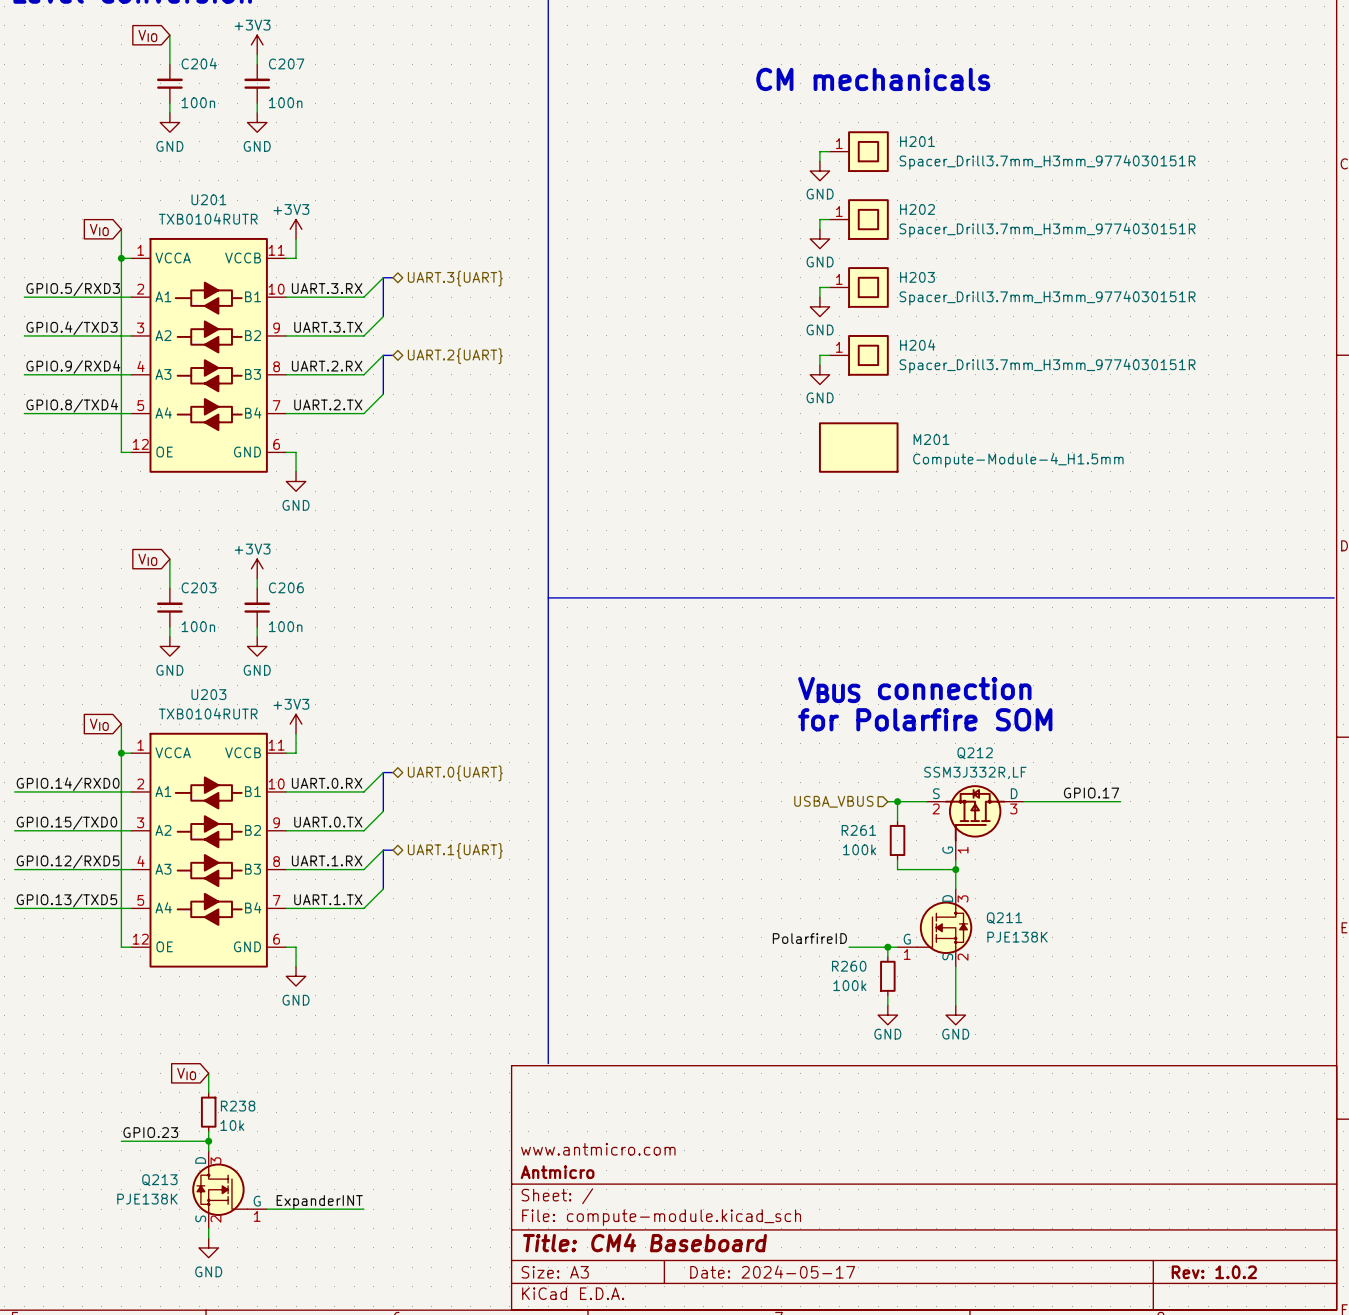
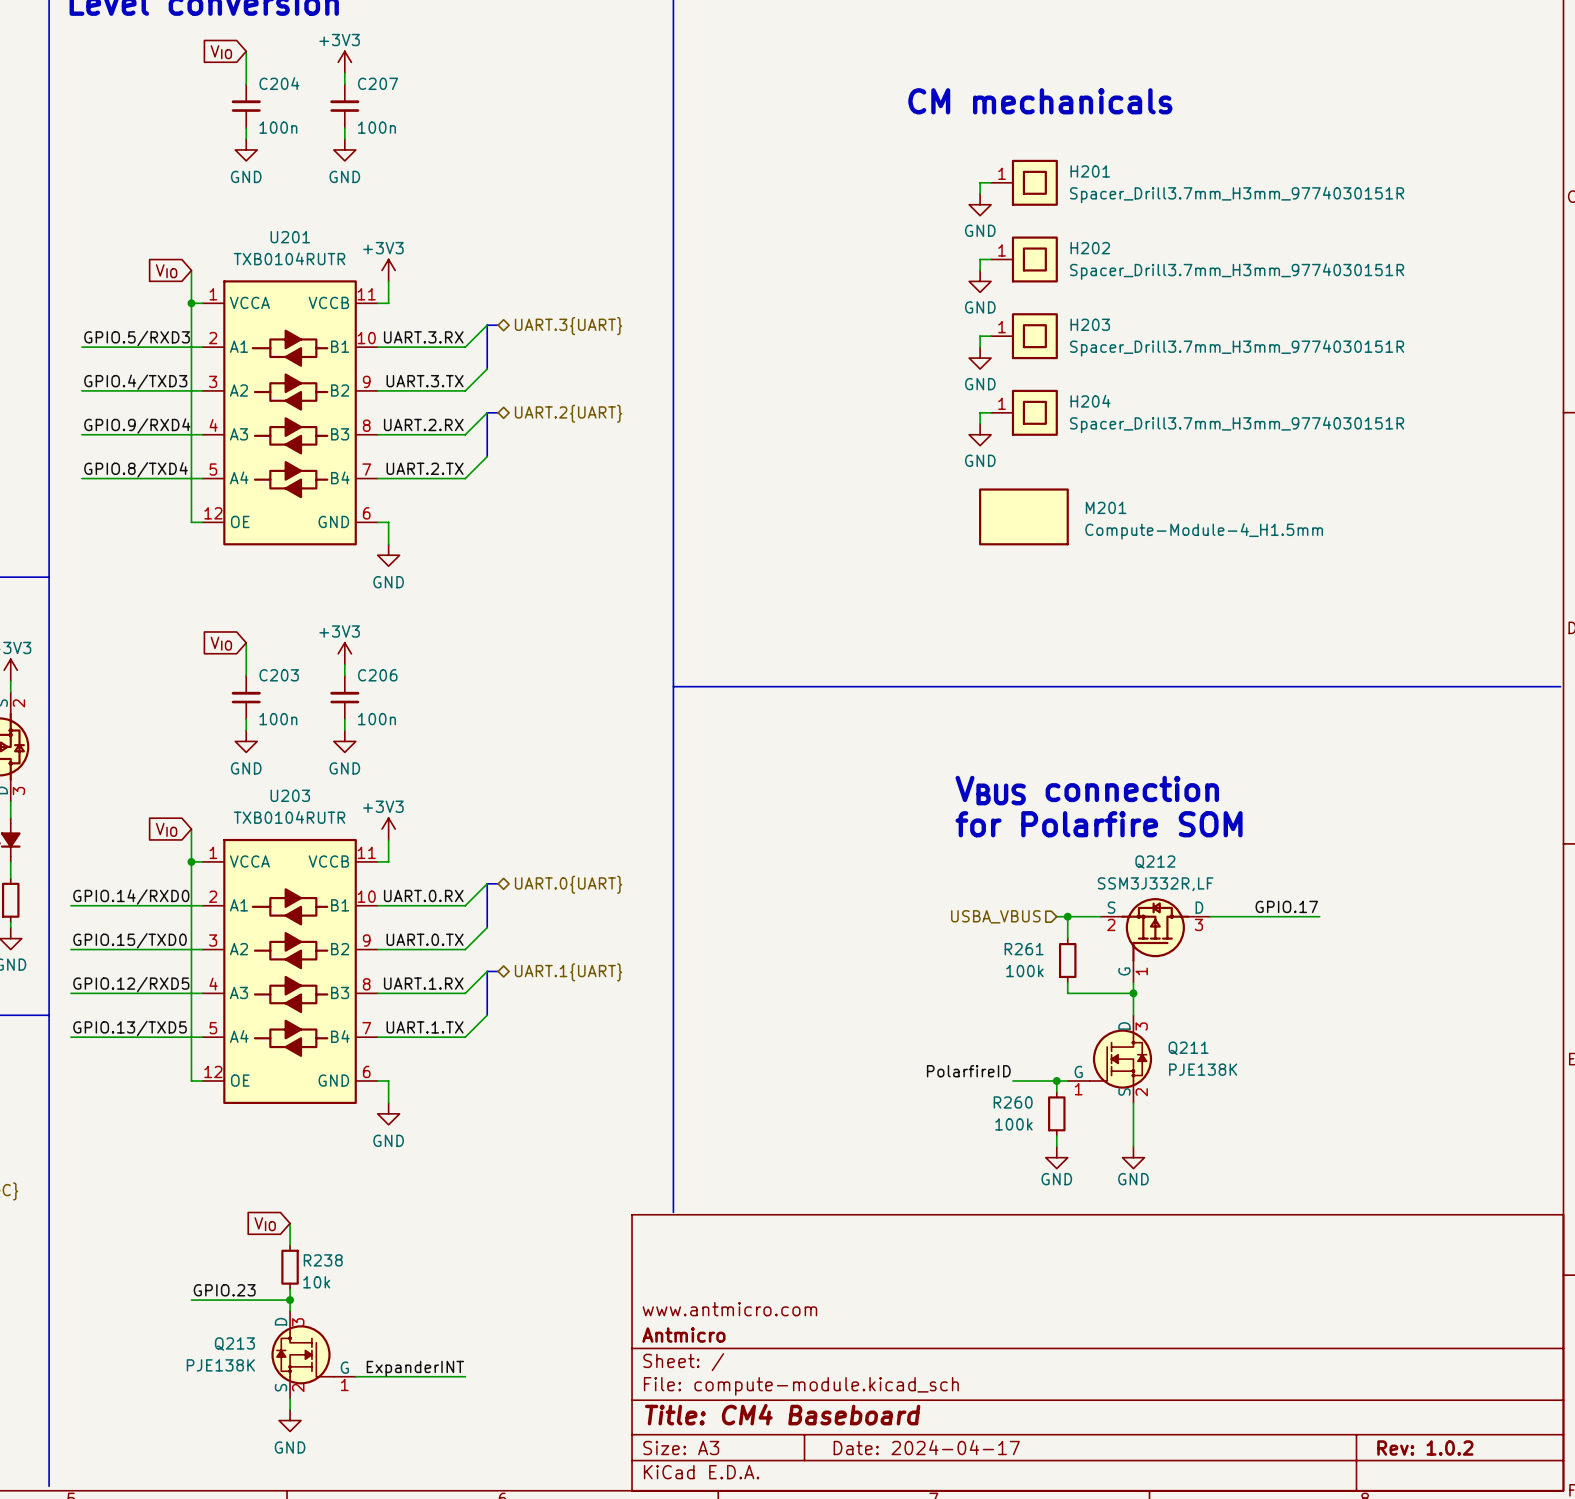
title block: Date: 2024-05-17 (772, 1272) -> Date: 2024-04-17 (926, 1447)

